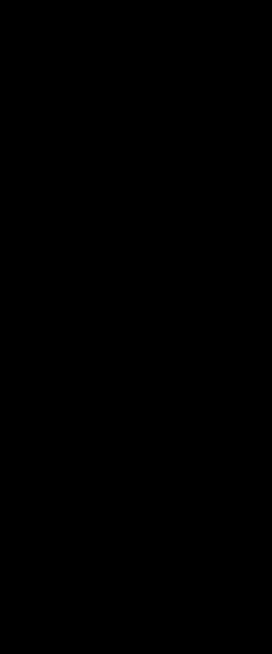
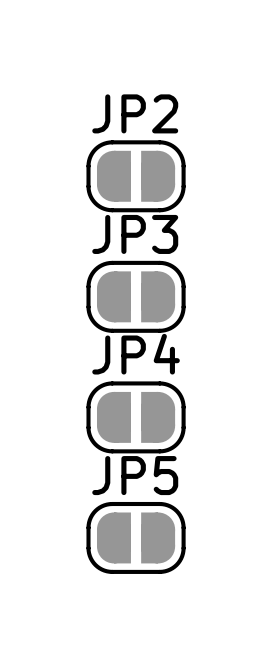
JP2: none -> (136, 176)
JP3: none -> (136, 296)
JP4: none -> (136, 417)
JP5: none -> (136, 537)

